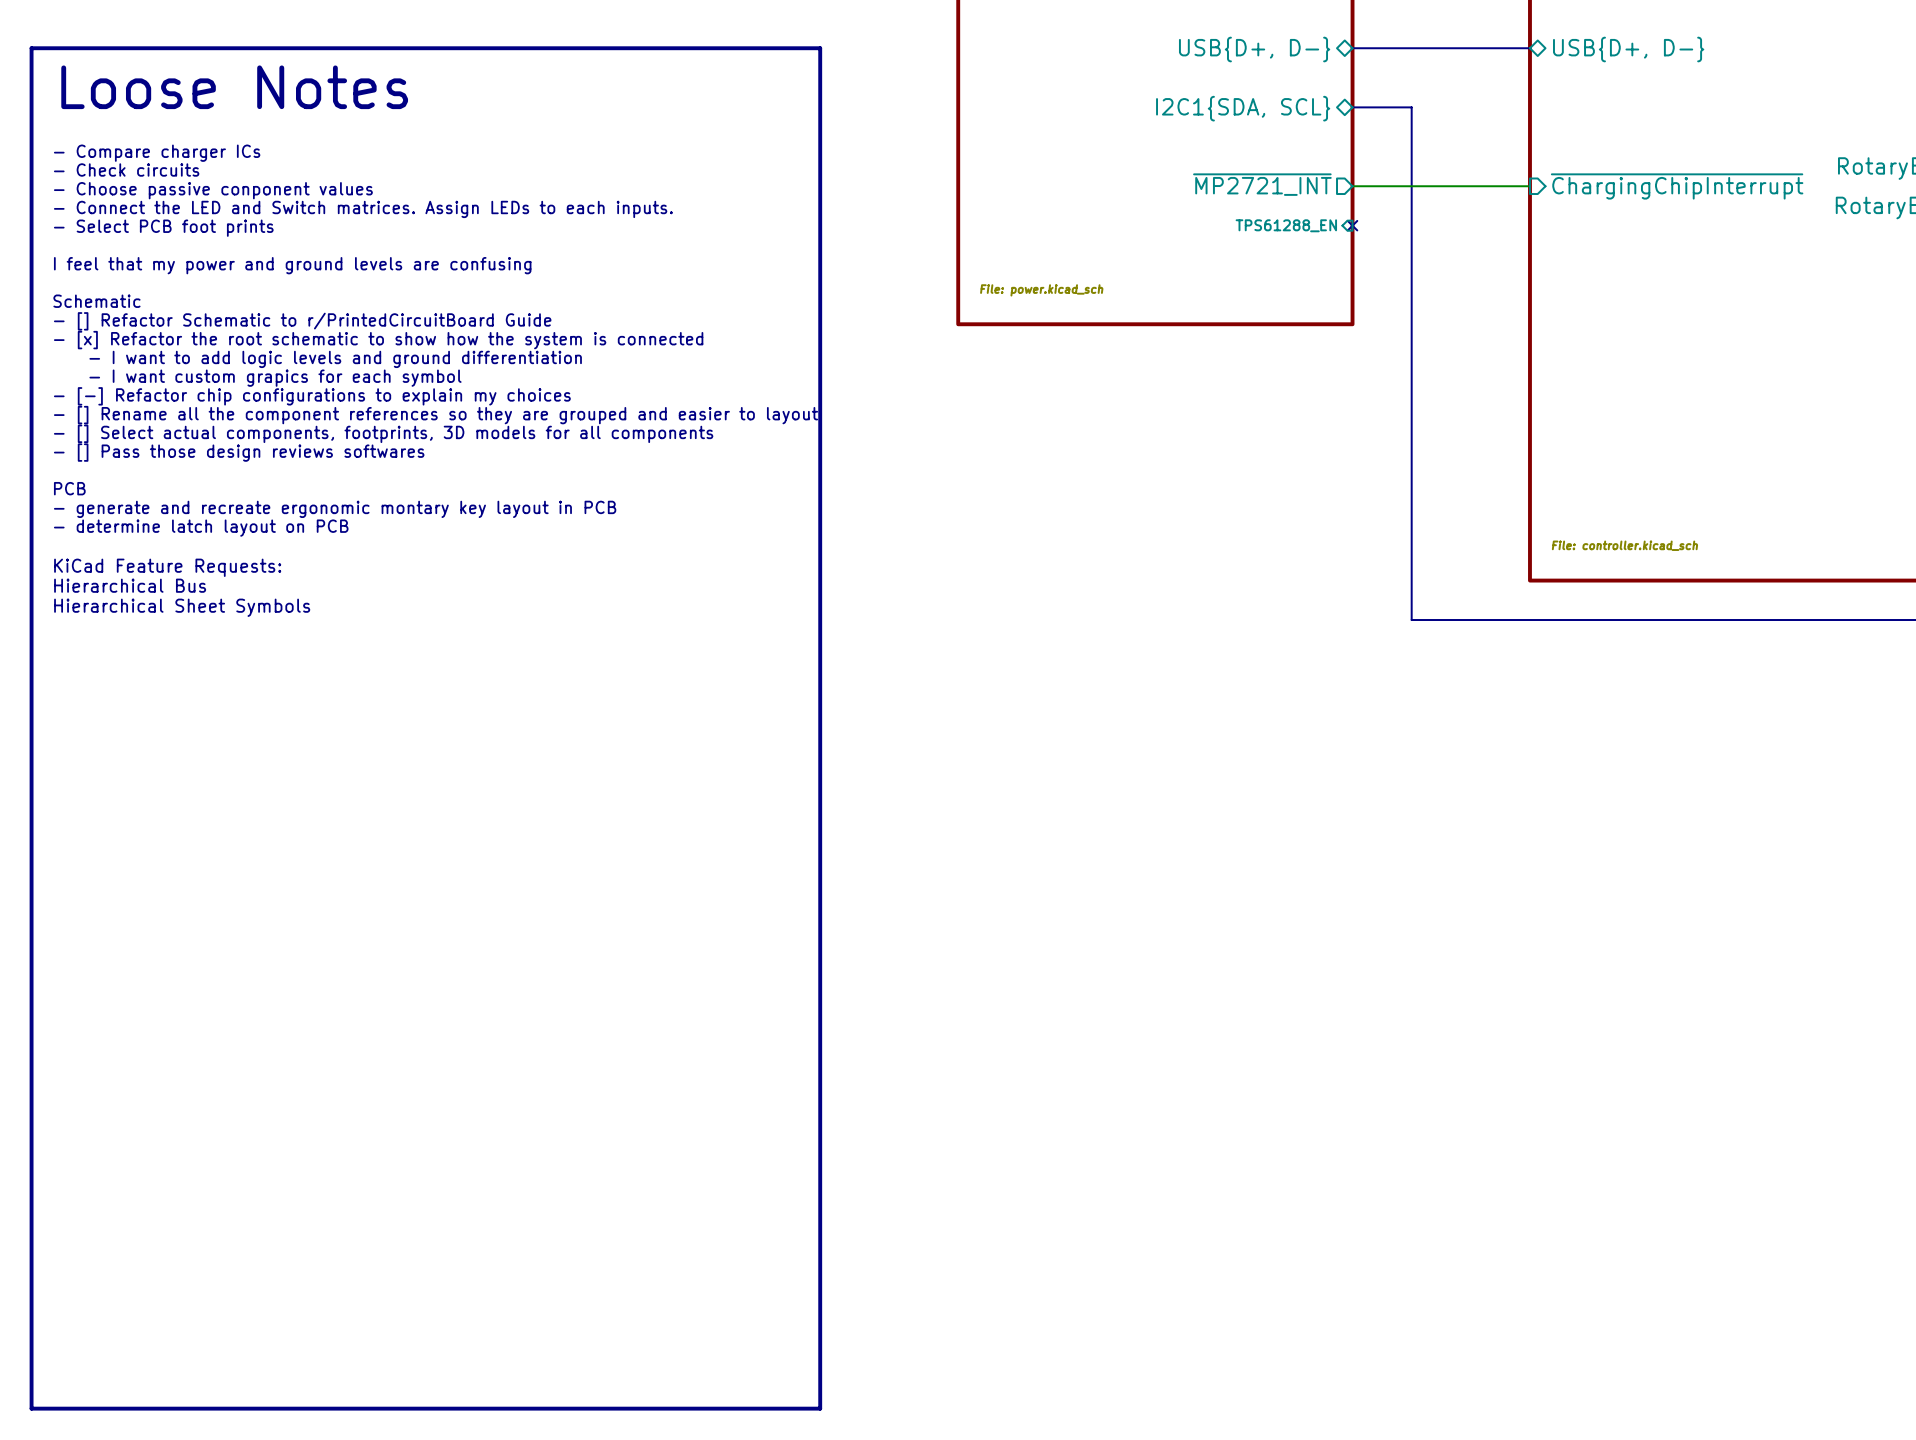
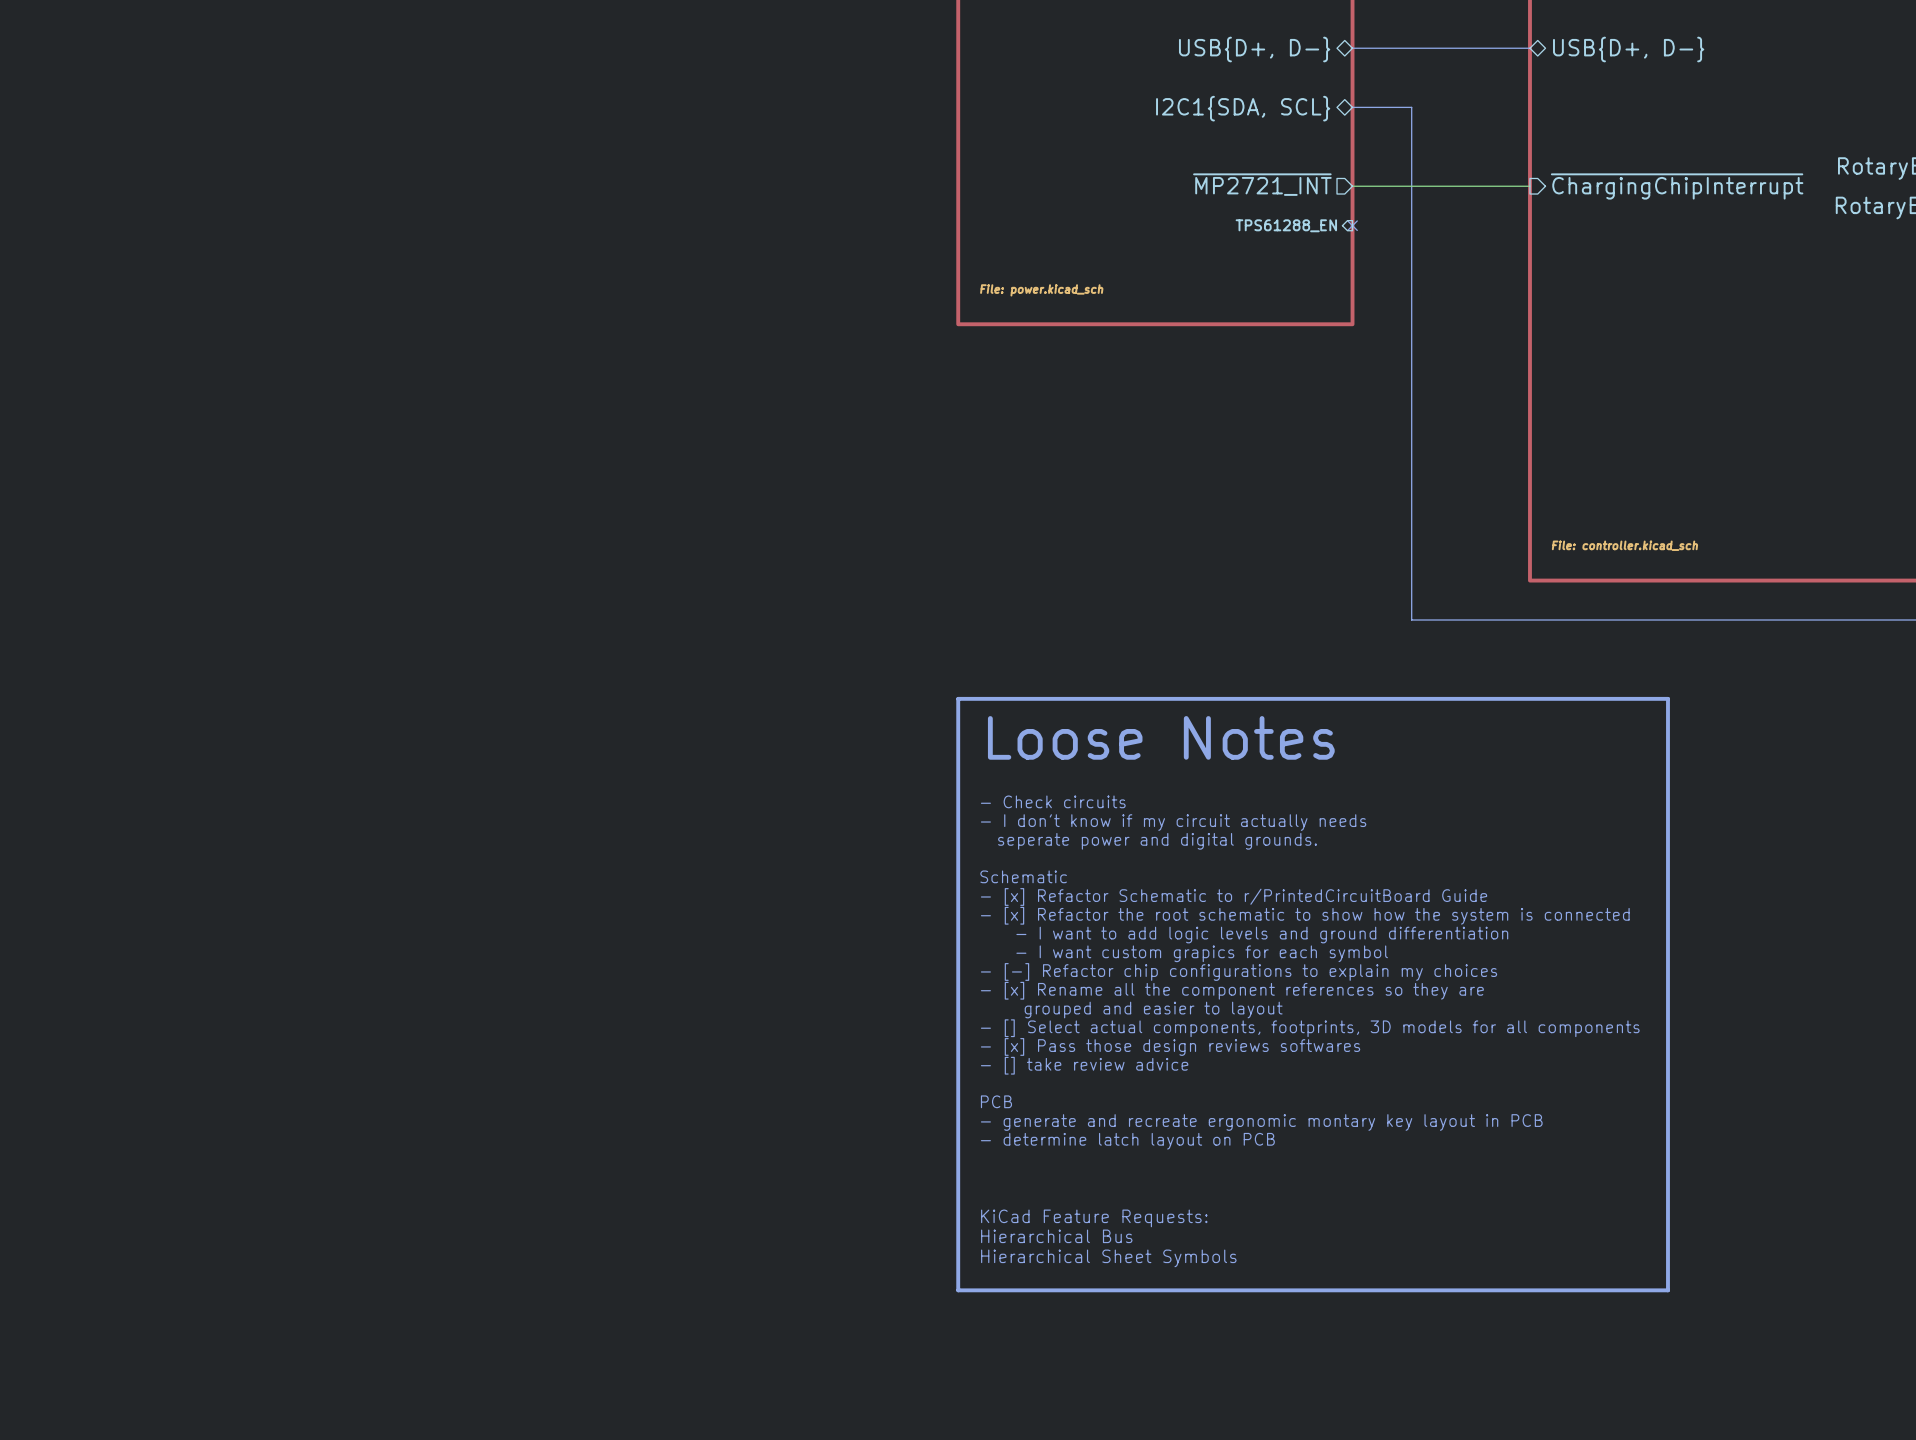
line: (31, 48) (820, 48) (820, 1408) (31, 1408) (31, 48) -> none
text: Loose Notes (234, 87) -> none
text: - Compare charger ICs (157, 153) -> none
text: - Check circuits (126, 170) -> none
text: - Choose passive conponent values (213, 190) -> none
text: - Connect the LED and Switch matrices. Assign LEDs to each inputs. (363, 209) -> none
text: - Select PCB foot prints (163, 228) -> none
text: I feel that my power and ground levels are confusing (292, 265) -> none
text: Schematic (96, 301) -> none
text: - [] Refactor Schematic to r/PrintedCircuitBoard Guide (302, 321) -> none
text: - [x] Refactor the root schematic to show how the system is connected (378, 340) -> none
text: - I want to add logic levels and ground differentiation (335, 359) -> none
text: - I want custom grapics for each symbol (275, 378) -> none
text: - [-] Refactor chip configurations to explain my choices (312, 396) -> none
text: - [] Rename all the component references so they are grouped and easier to layout (436, 415) -> none
text: - [] Select actual components, footprints, 3D models for all components (383, 433) -> none
text: - [] Pass those design reviews softwares (239, 452) -> none
text: PCB (69, 488) -> none
text: - generate and recreate ergonomic montary key layout in PCB (335, 509) -> none
text: - determine latch layout on PCB (201, 528) -> none
text: KiCad Feature Requests: (167, 567) -> none
text: Hierarchical Bus (130, 585) -> none
text: Hierarchical Sheet Symbols (182, 607) -> none
line: none -> (958, 698) (1667, 698) (1667, 1290) (958, 1290) (958, 698)
text: none -> Loose Notes (1161, 737)
text: none -> - Check circuits (1053, 801)
text: none -> - I don't know if my circuit actually needs (1173, 822)
text: none -> seperate power and digital grounds. (1157, 841)
text: none -> Schematic (1023, 876)
text: none -> - [x] Refactor Schematic to r/PrintedCircuitBoard Guide (1234, 896)
text: none -> - [x] Refactor the root schematic to show how the system is connected (1305, 915)
text: none -> - I want to add logic levels and ground differentiation (1262, 935)
text: none -> - I want custom grapics for each symbol (1202, 953)
text: none -> - [-] Refactor chip configurations to explain my choices (1239, 971)
text: none -> - [x] Rename all the component references so they are (1232, 990)
text: none -> grouped and easier to layout (1153, 1010)
text: none -> - [] Select actual components, footprints, 3D models for all components (1310, 1028)
text: none -> - [x] Pass those design reviews softwares (1170, 1046)
text: none -> - [] take review advice (1084, 1065)
text: none -> PCB (996, 1101)
text: none -> - generate and recreate ergonomic montary key layout in PCB (1261, 1122)
text: none -> - determine latch layout on PCB (1127, 1141)
text: none -> KiCad Feature Requests: (1094, 1218)
text: none -> Hierarchical Bus (1056, 1236)
text: none -> Hierarchical Sheet Symbols (1108, 1258)

